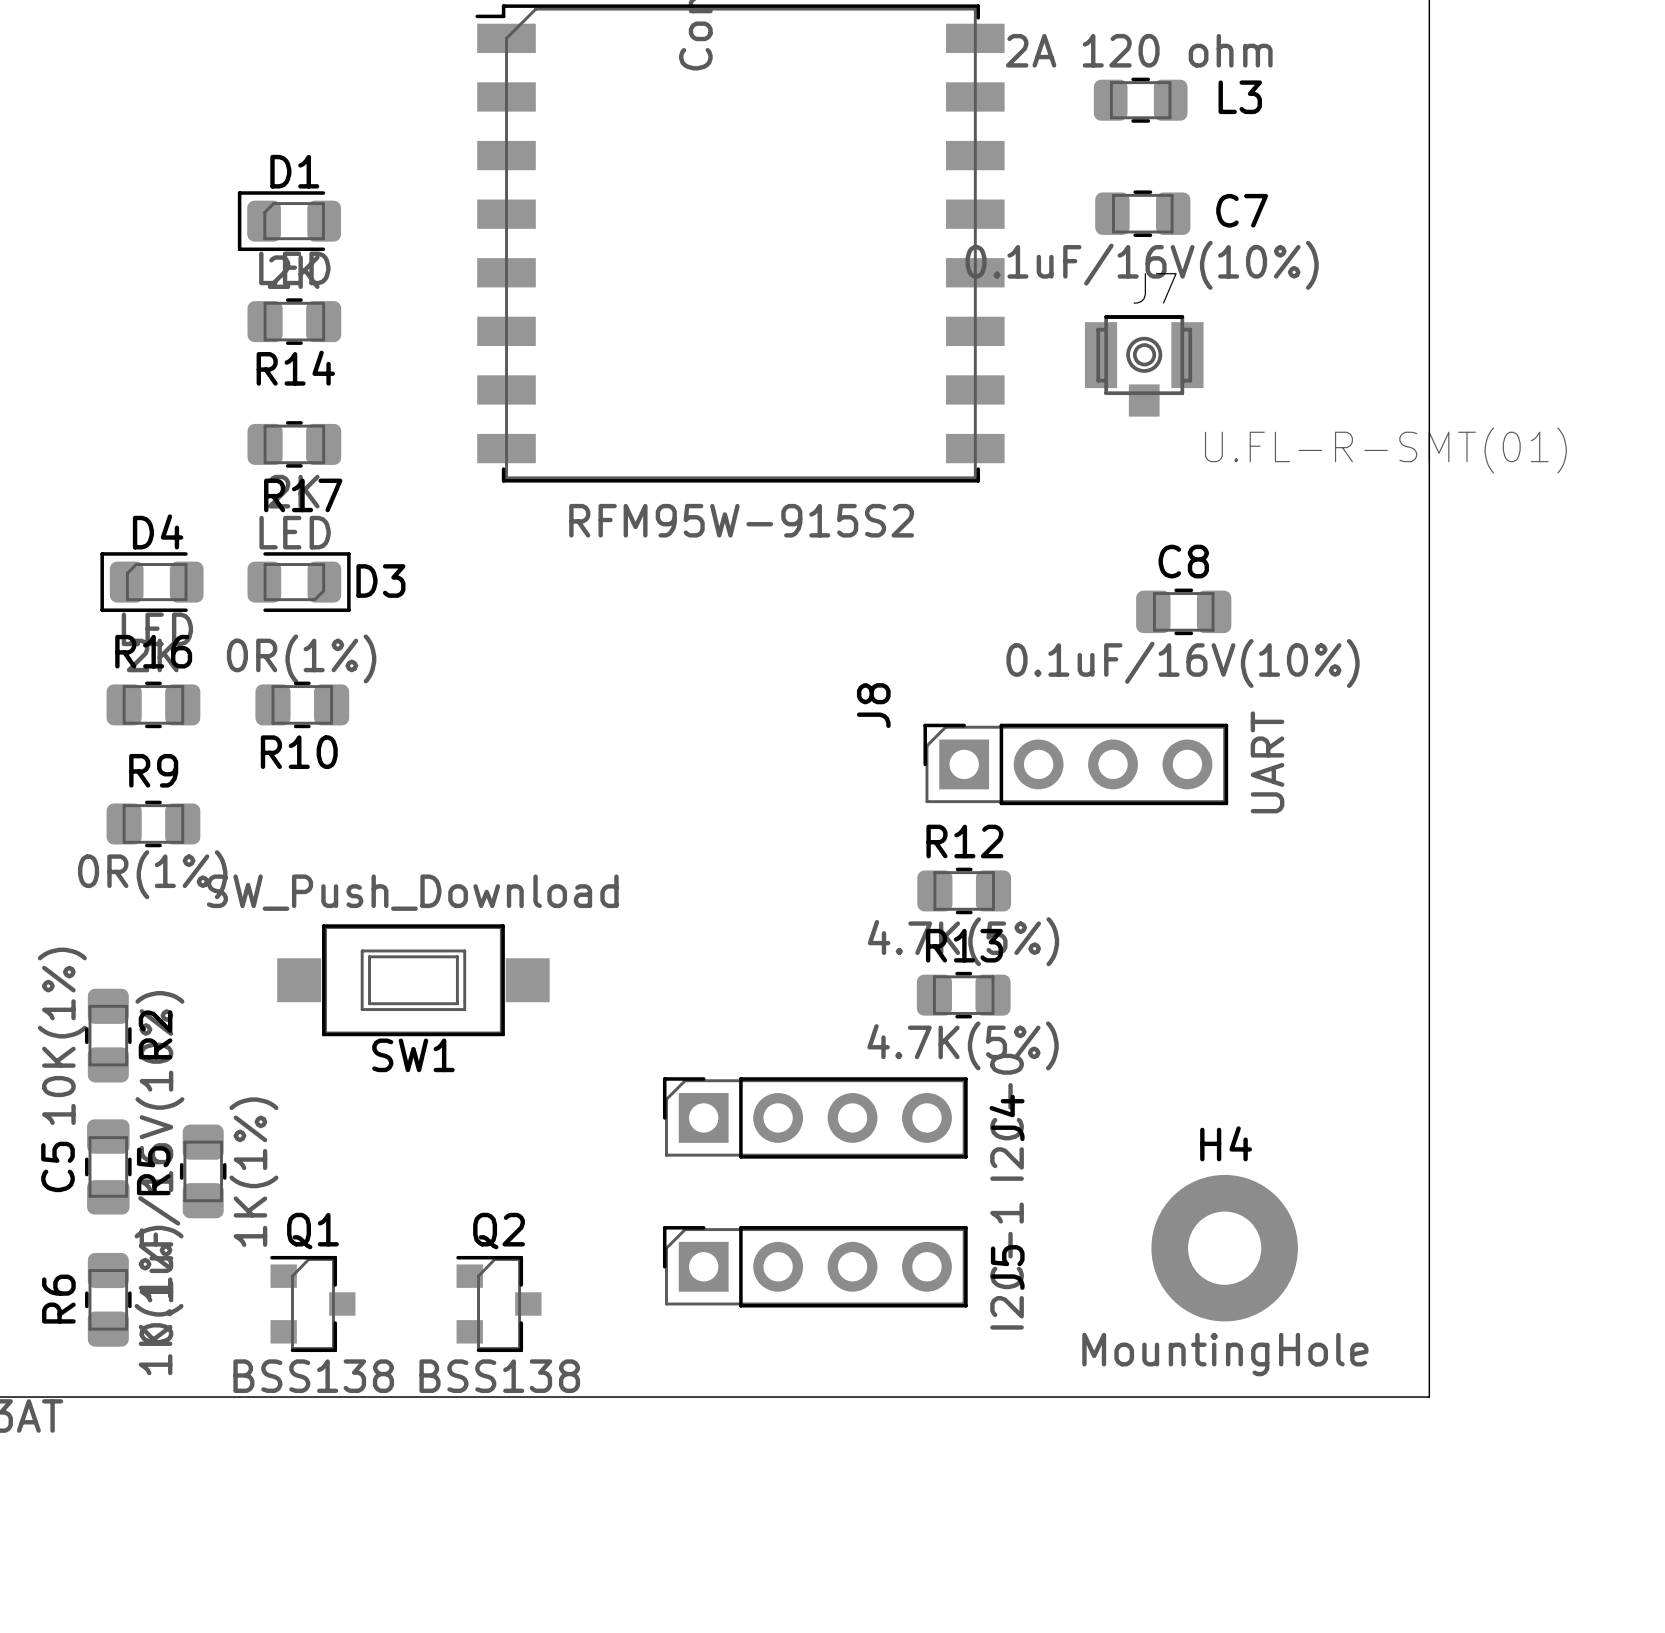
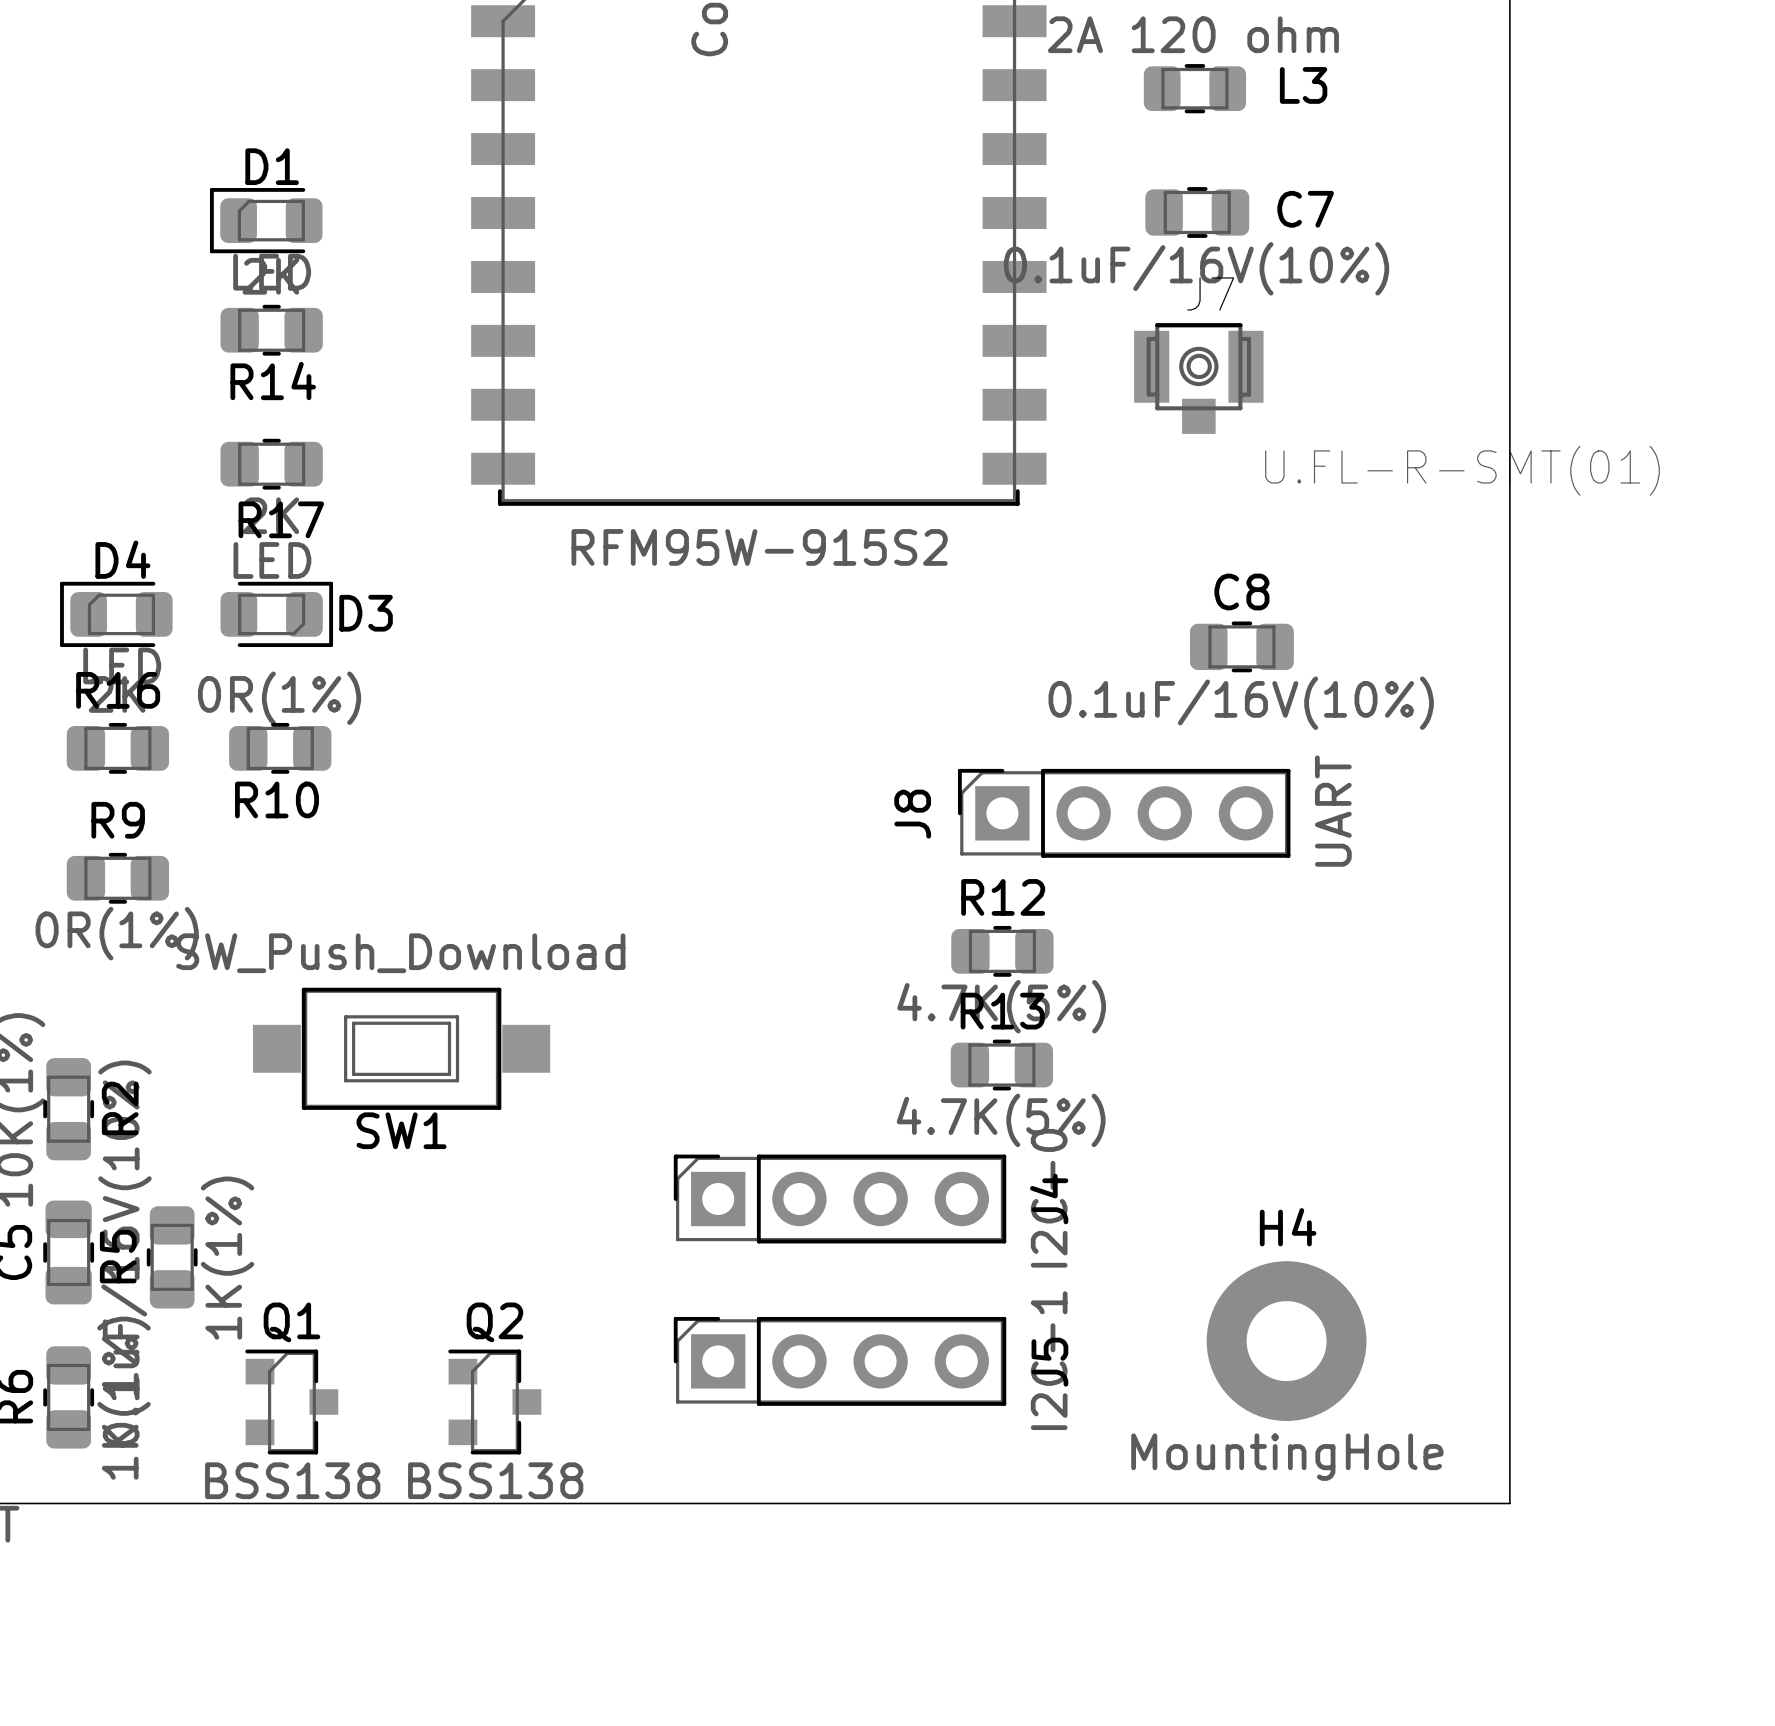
J8 name position: J8 (873, 705) -> J8 (912, 814)

